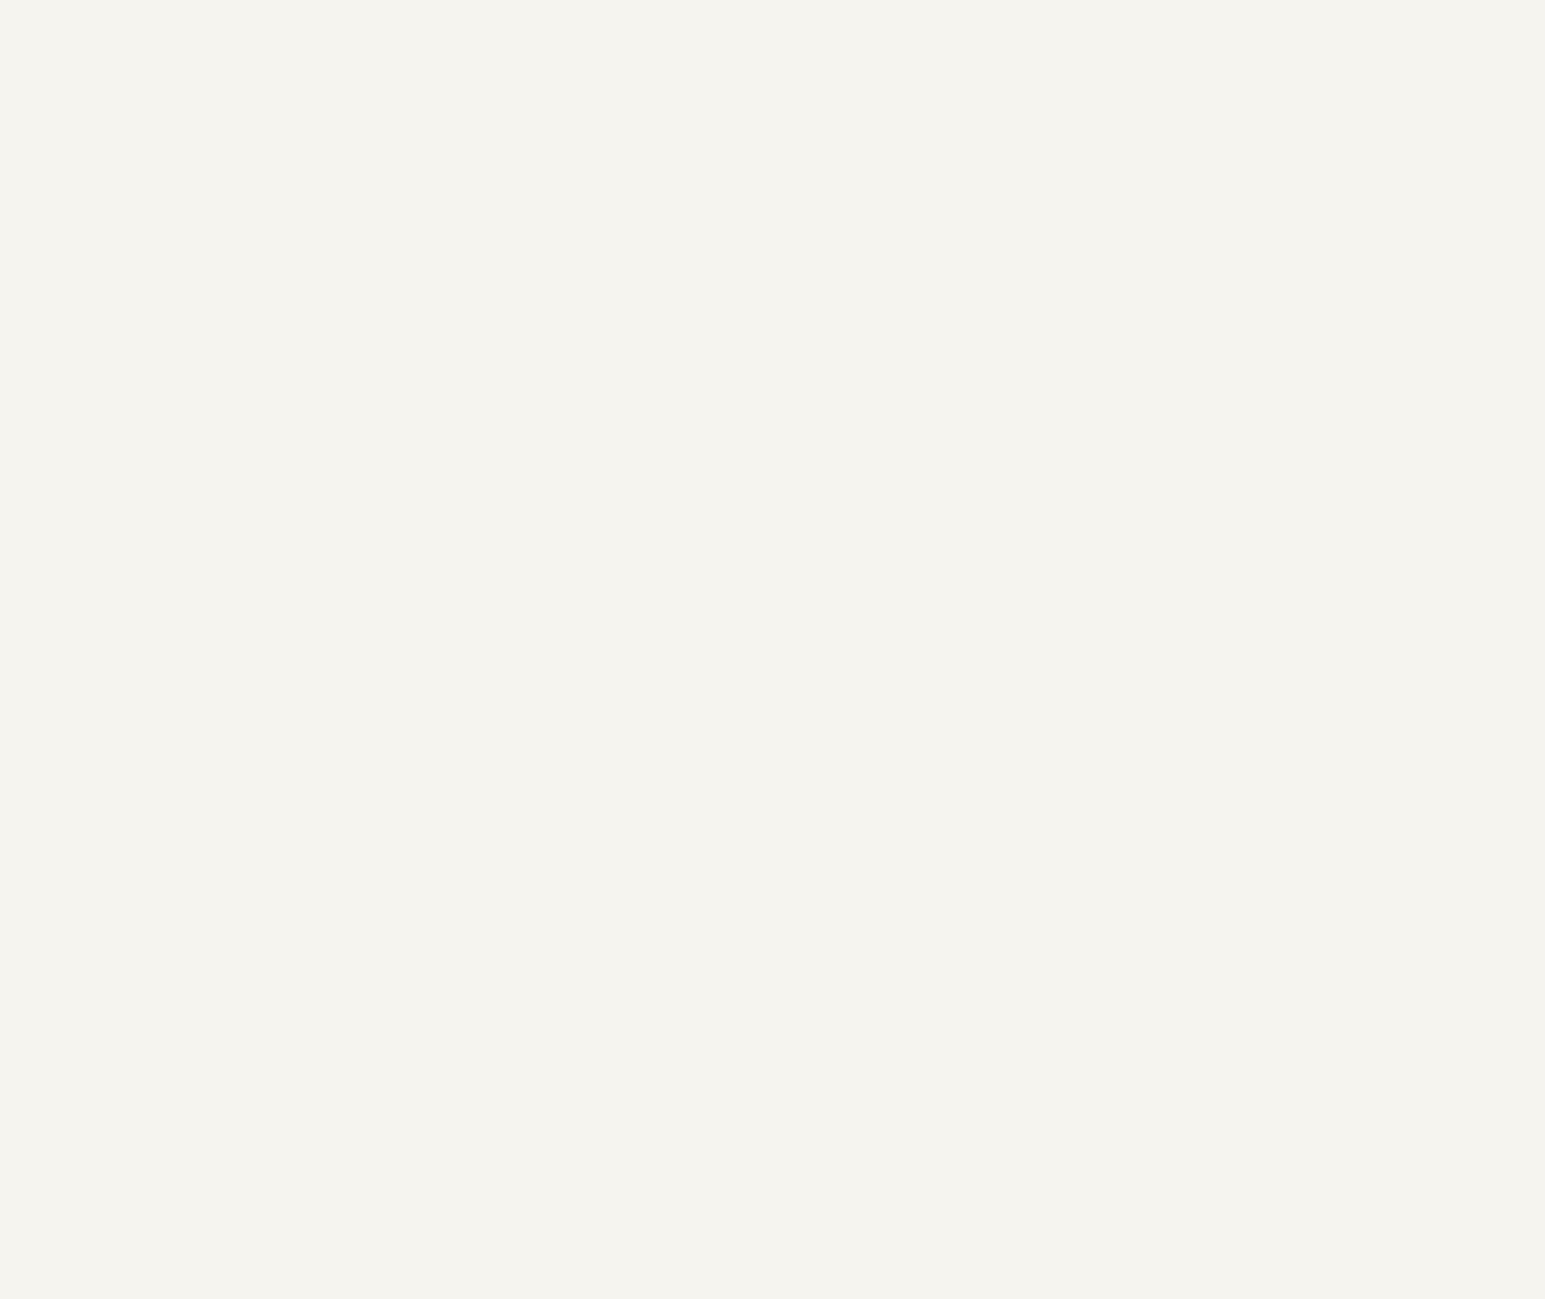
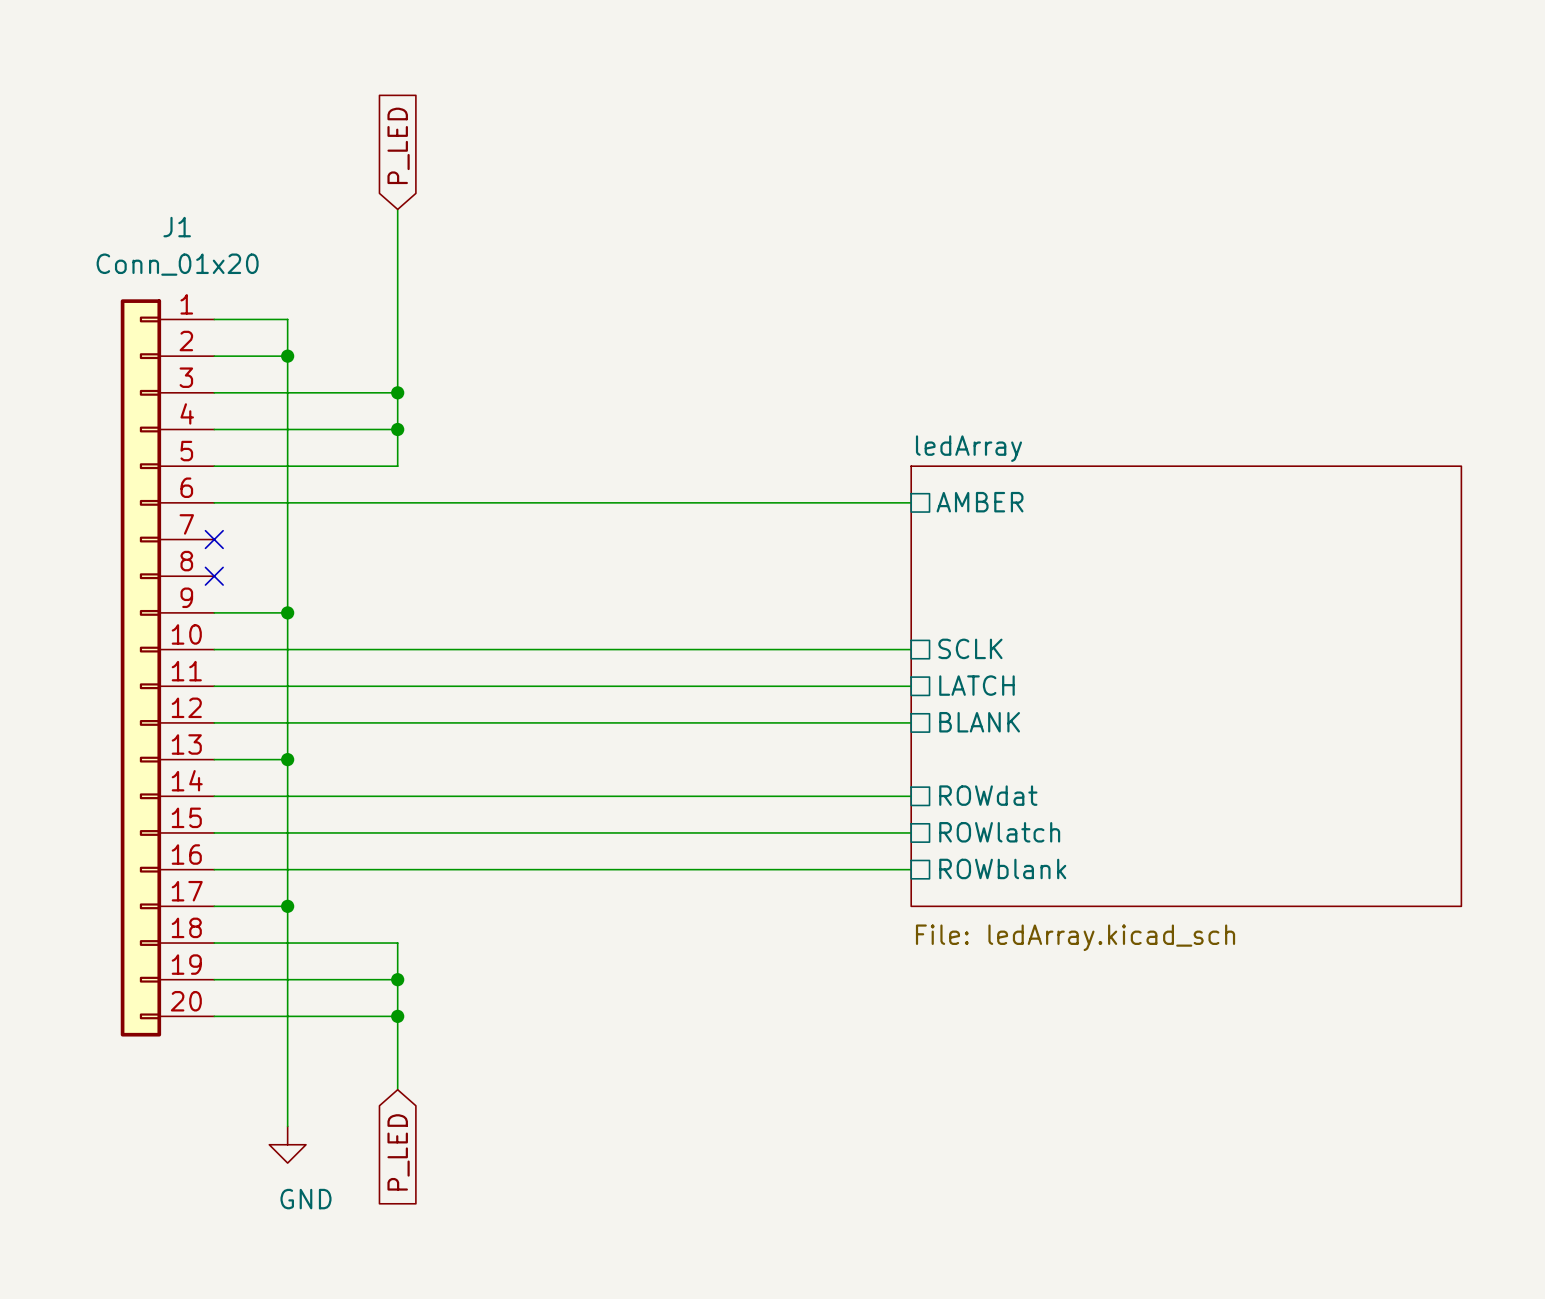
global label: none -> P_LED (398, 145)
wire: none -> (397, 209) (397, 466) (214, 466)
wire: none -> (214, 319) (287, 319) (287, 1126)
wire: none -> (214, 356) (287, 356)
junction: none -> (287, 356)
wire: none -> (214, 392) (397, 392)
junction: none -> (397, 392)
wire: none -> (214, 429) (397, 429)
junction: none -> (397, 429)
wire: none -> (214, 502) (911, 502)
sheet pin: none -> AMBER (980, 502)
no-connect mark: none -> (214, 539)
no-connect mark: none -> (214, 576)
wire: none -> (214, 612) (287, 612)
junction: none -> (287, 612)
sheet pin: none -> SCLK (970, 648)
wire: none -> (214, 649) (911, 649)
J1: none -> Conn_01x20 (167, 667)
sheet pin: none -> LATCH (976, 685)
wire: none -> (214, 686) (911, 686)
sheet ledArray: none -> File: ledArray.kicad_sch (1186, 686)
wire: none -> (214, 722) (911, 722)
sheet pin: none -> BLANK (979, 722)
wire: none -> (214, 759) (287, 759)
junction: none -> (287, 759)
sheet pin: none -> ROWdat (988, 795)
wire: none -> (214, 796) (911, 796)
wire: none -> (214, 832) (911, 832)
sheet pin: none -> ROWlatch (999, 832)
sheet pin: none -> ROWblank (1002, 868)
wire: none -> (214, 869) (911, 869)
wire: none -> (214, 906) (287, 906)
junction: none -> (287, 906)
wire: none -> (214, 943) (397, 943) (397, 1089)
wire: none -> (214, 979) (397, 979)
junction: none -> (397, 979)
wire: none -> (214, 1016) (397, 1016)
junction: none -> (397, 1016)
power symbol: none -> GND (287, 1144)
global label: none -> P_LED (398, 1152)

